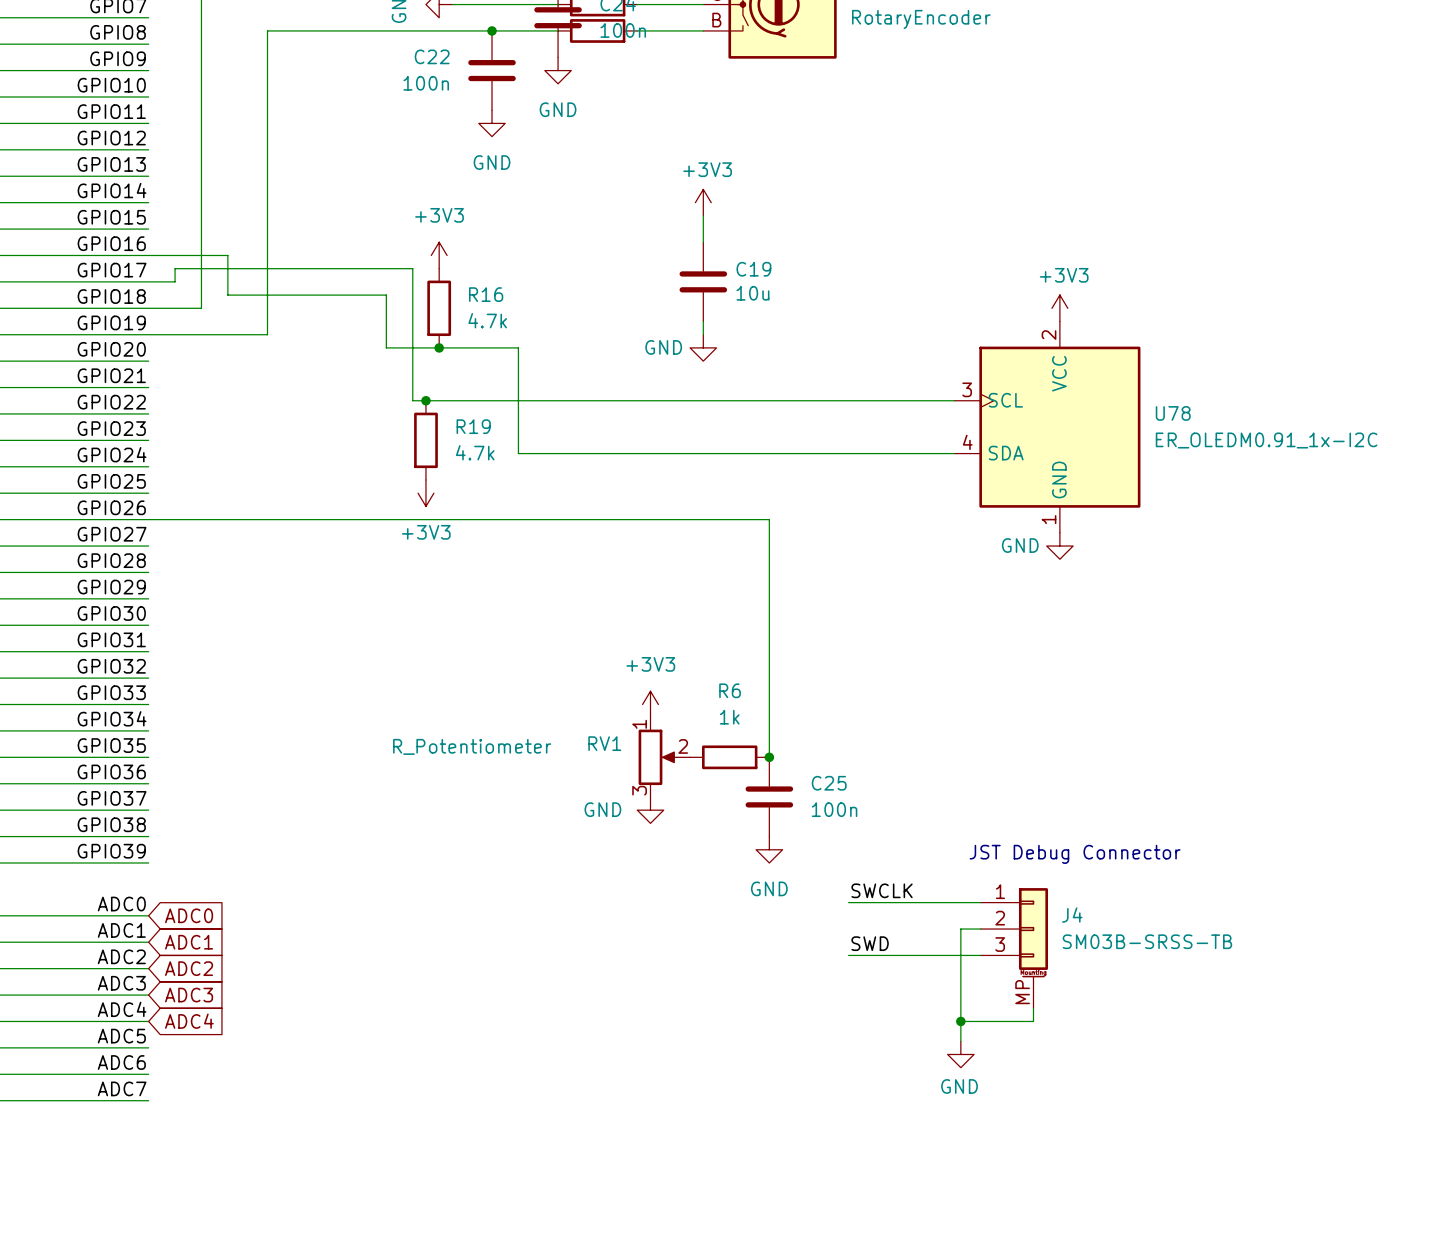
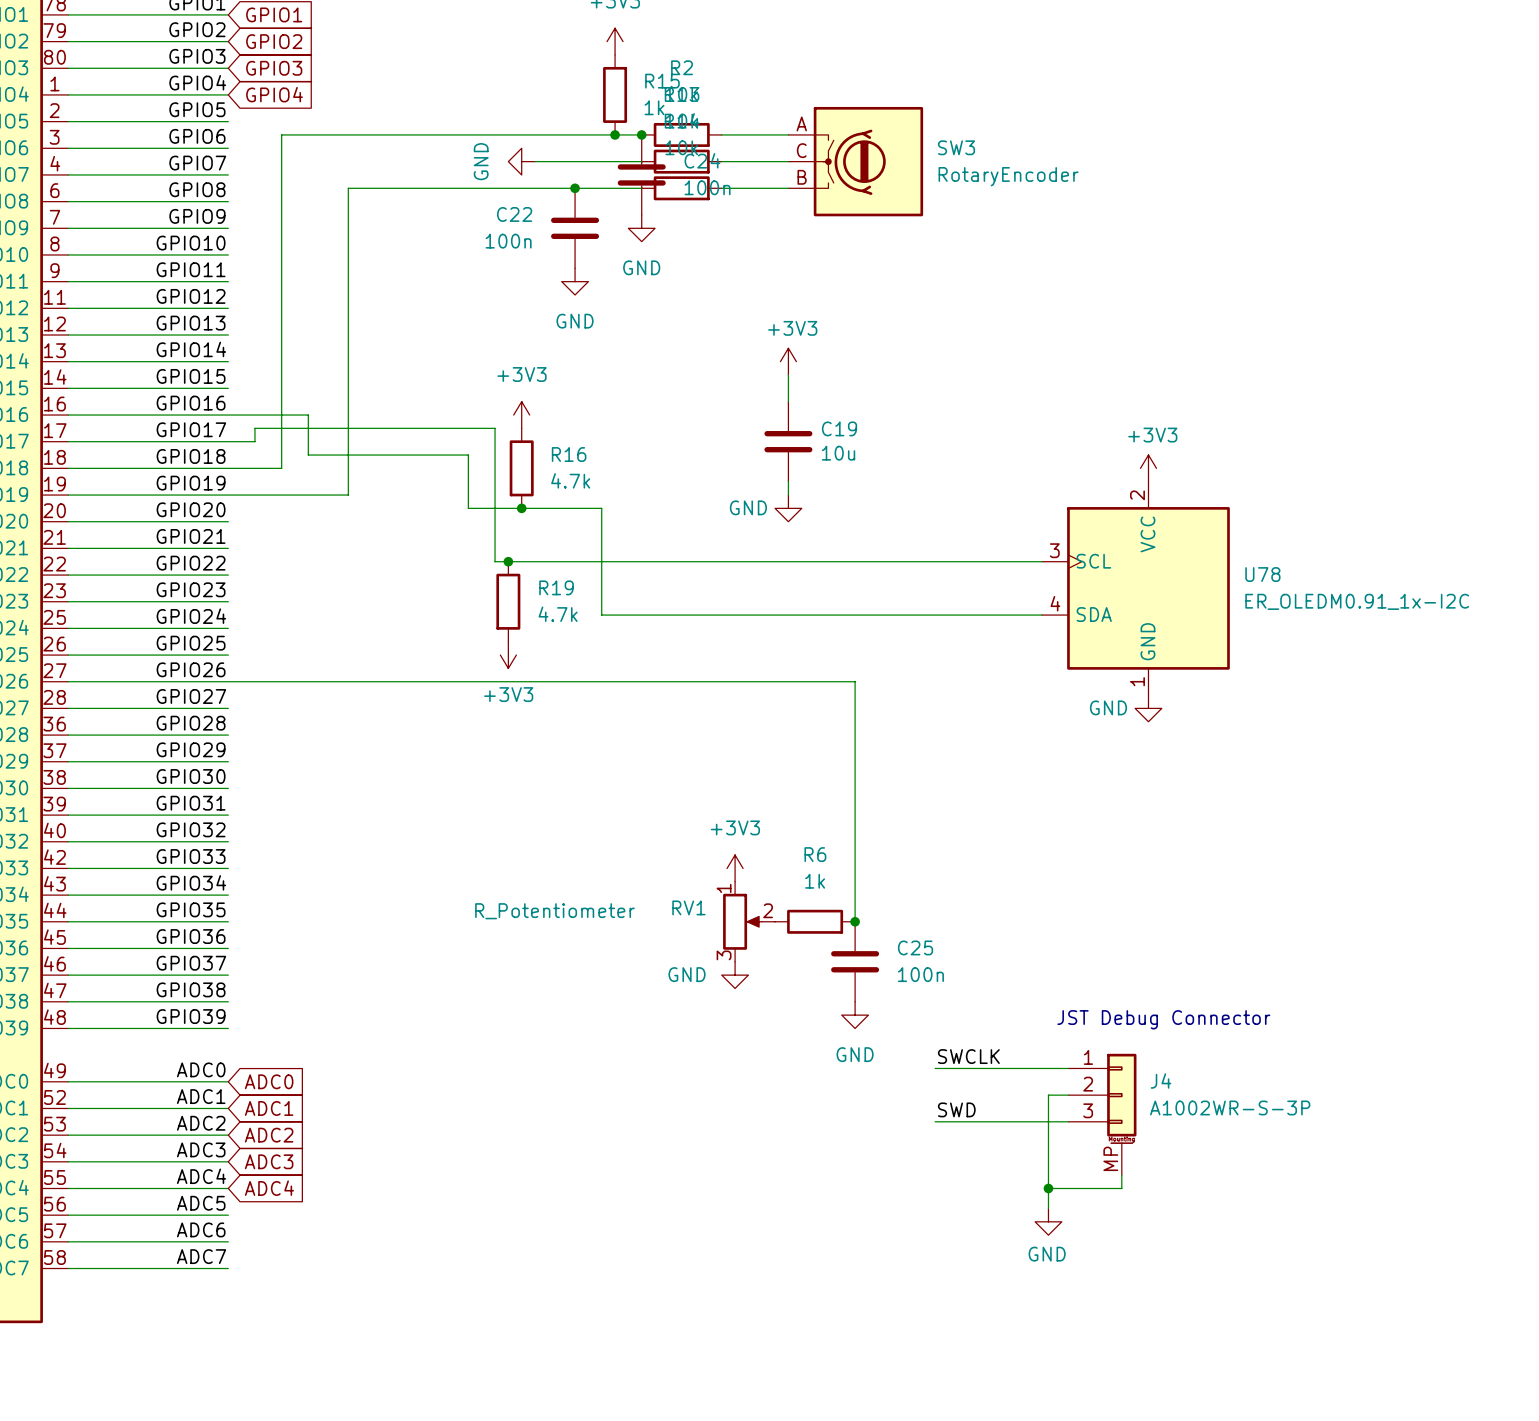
J4 value: SM03B-SRSS-TB (1147, 941) -> A1002WR-S-3P (1230, 1107)

